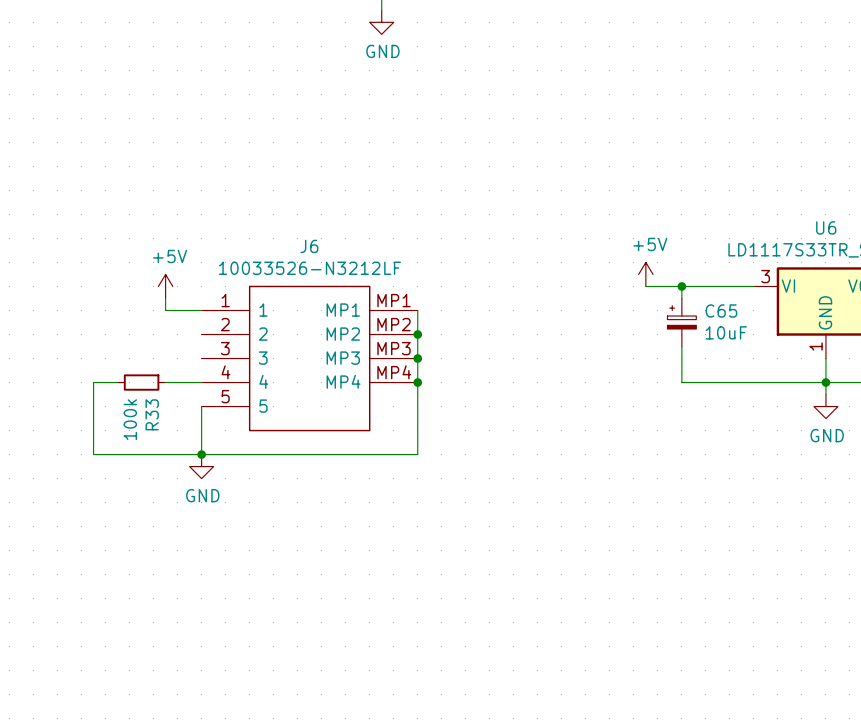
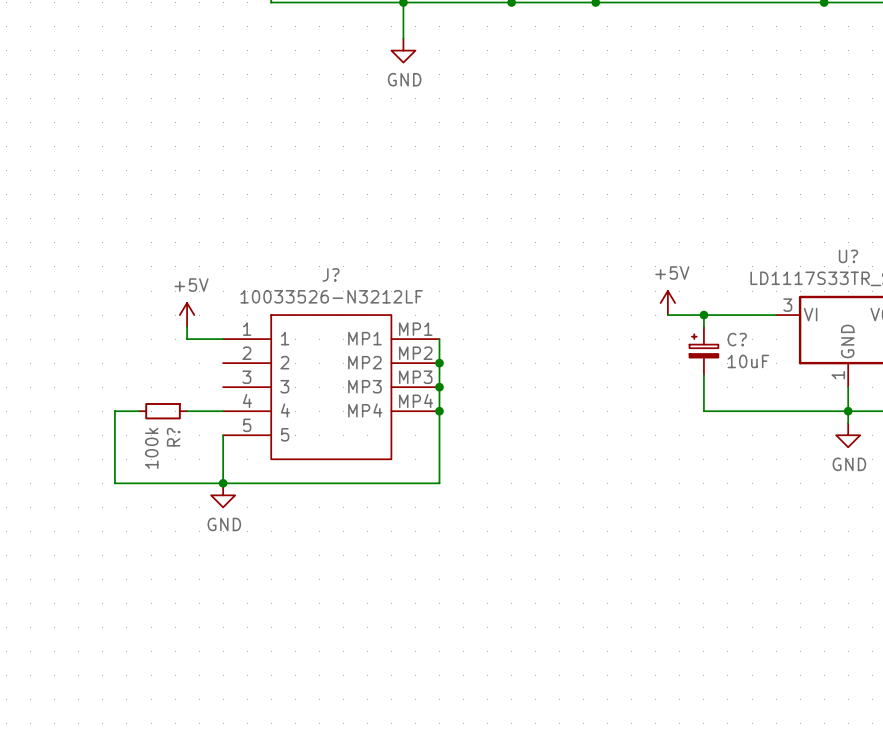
U6 name: U6 (826, 227) -> U? (848, 256)
J6 name: J6 (309, 246) -> J? (331, 274)
C65 name: C65 (721, 311) -> C? (737, 339)
R33 name: R33 (152, 414) -> R? (173, 437)

